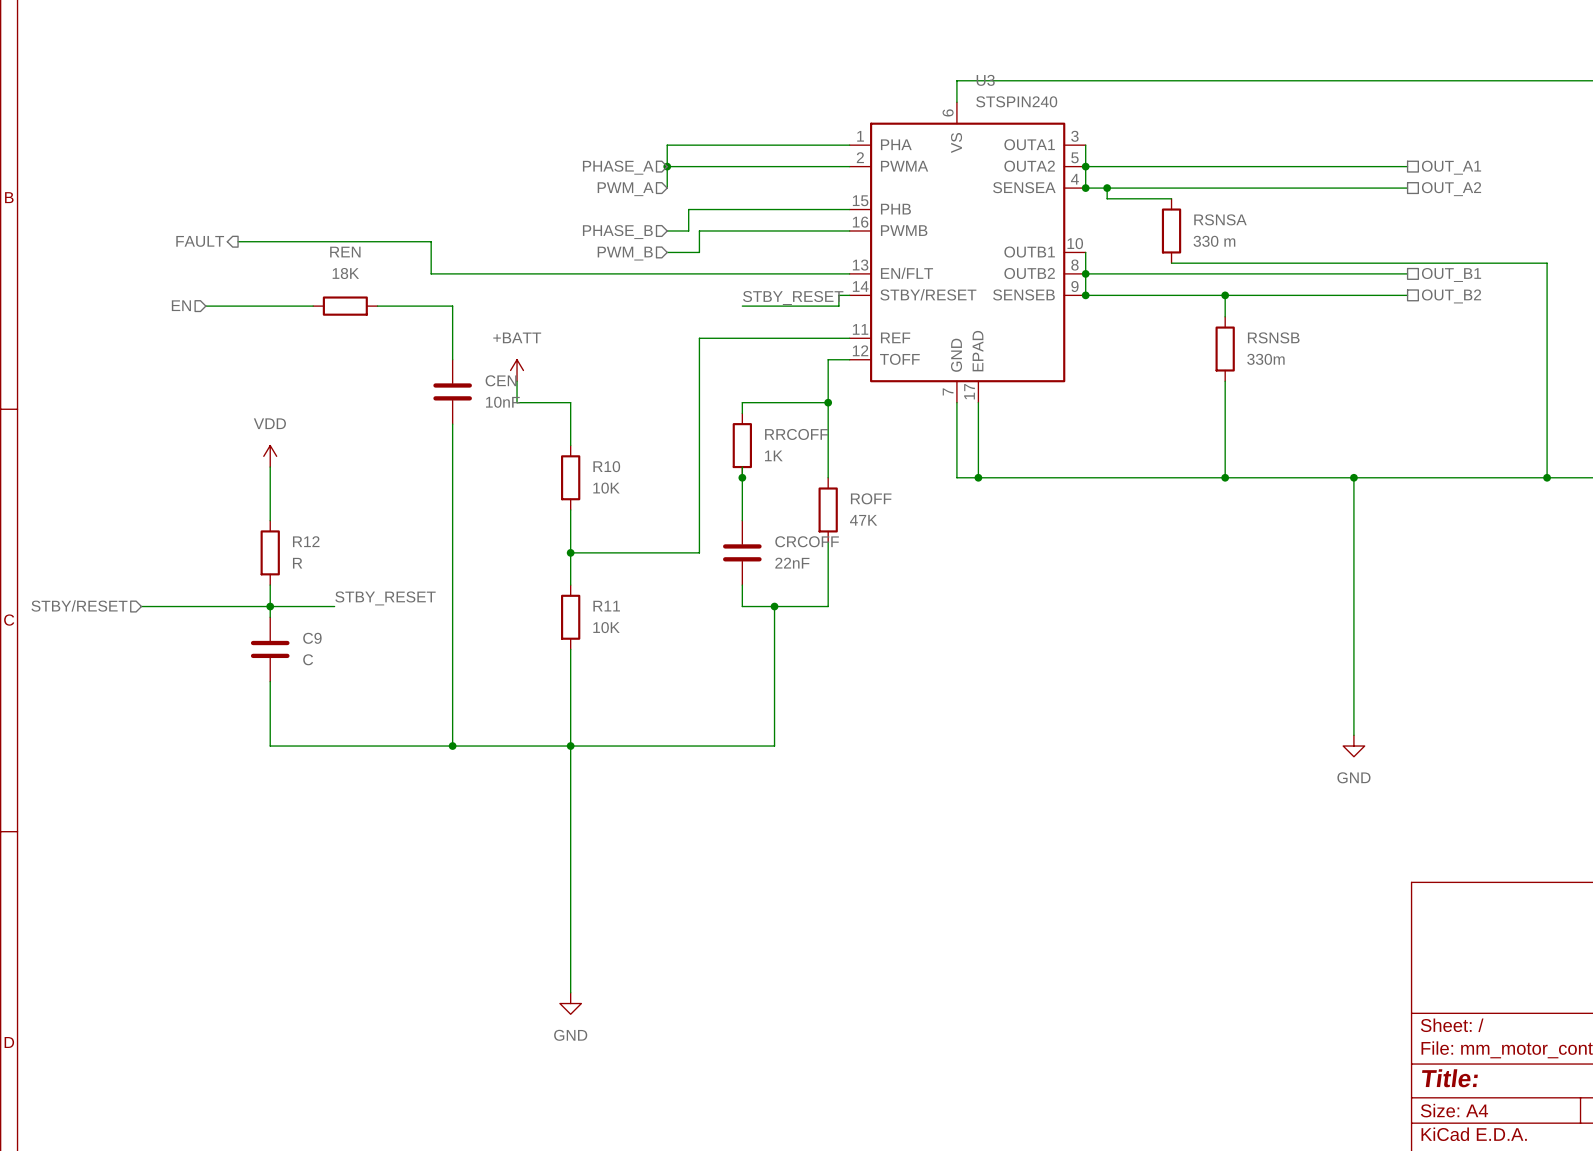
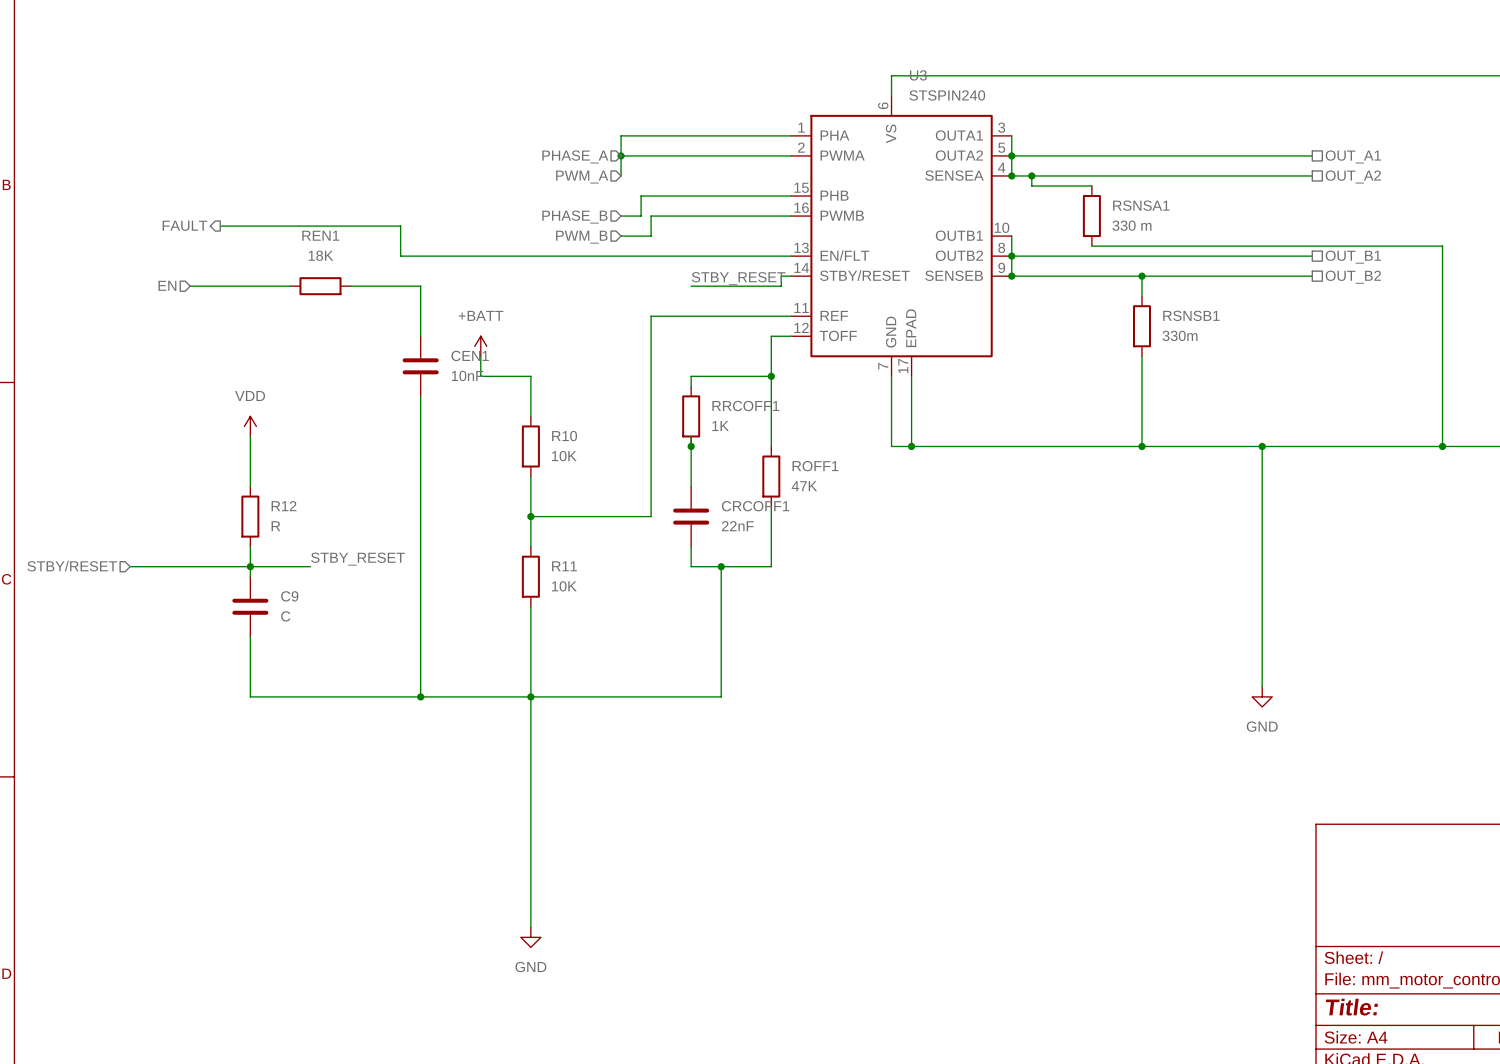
RSNSA name: RSNSA (1220, 219) -> RSNSA1 (1141, 205)
REN name: REN (345, 252) -> REN1 (320, 235)
RSNSB name: RSNSB (1273, 337) -> RSNSB1 (1191, 315)
CEN name: CEN (501, 380) -> CEN1 (470, 355)
RRCOFF name: RRCOFF (796, 434) -> RRCOFF1 (745, 406)
ROFF name: ROFF (871, 498) -> ROFF1 (815, 466)
CRCOFF name: CRCOFF (807, 541) -> CRCOFF1 (755, 506)

